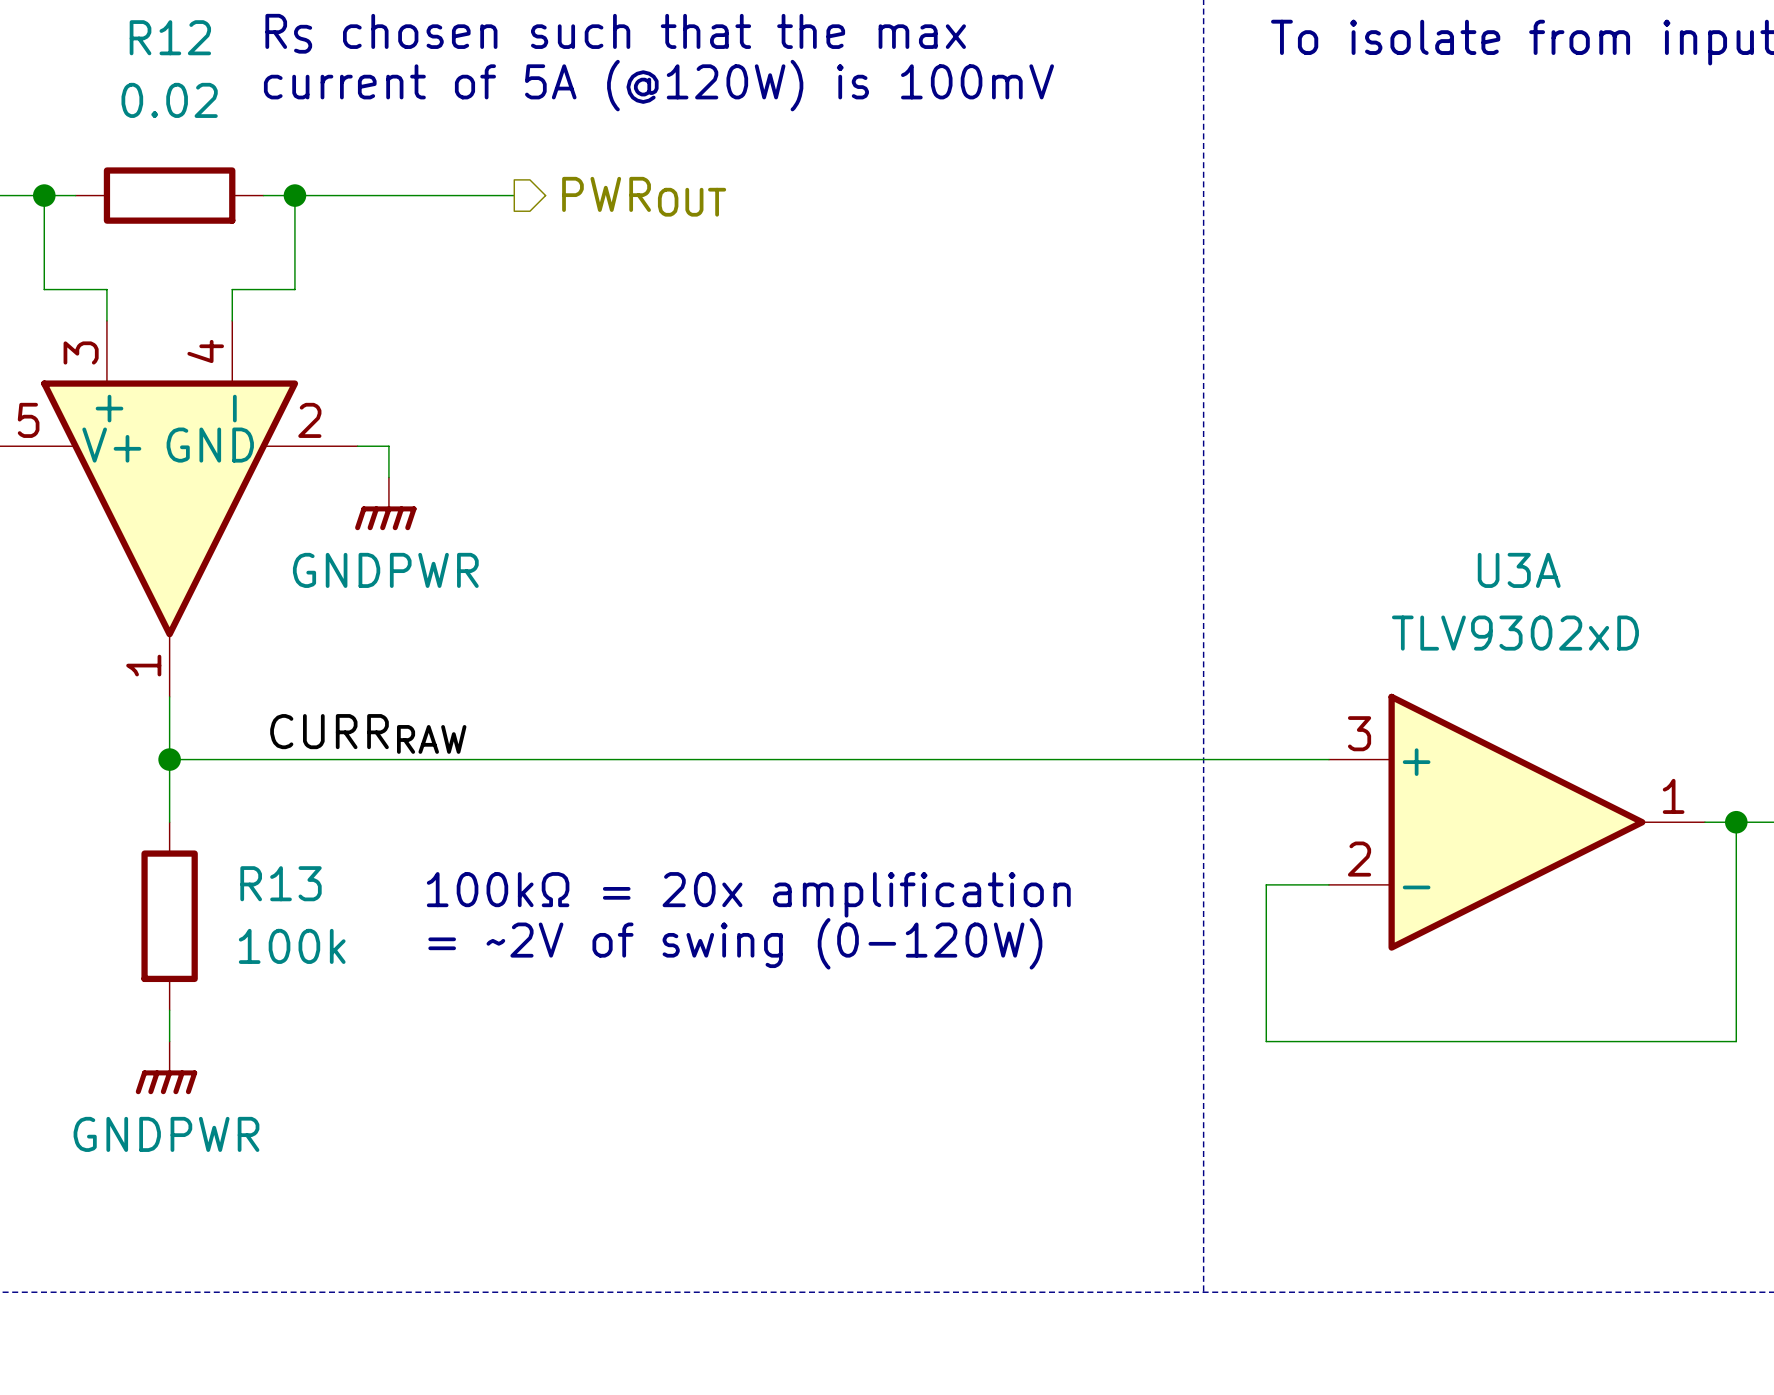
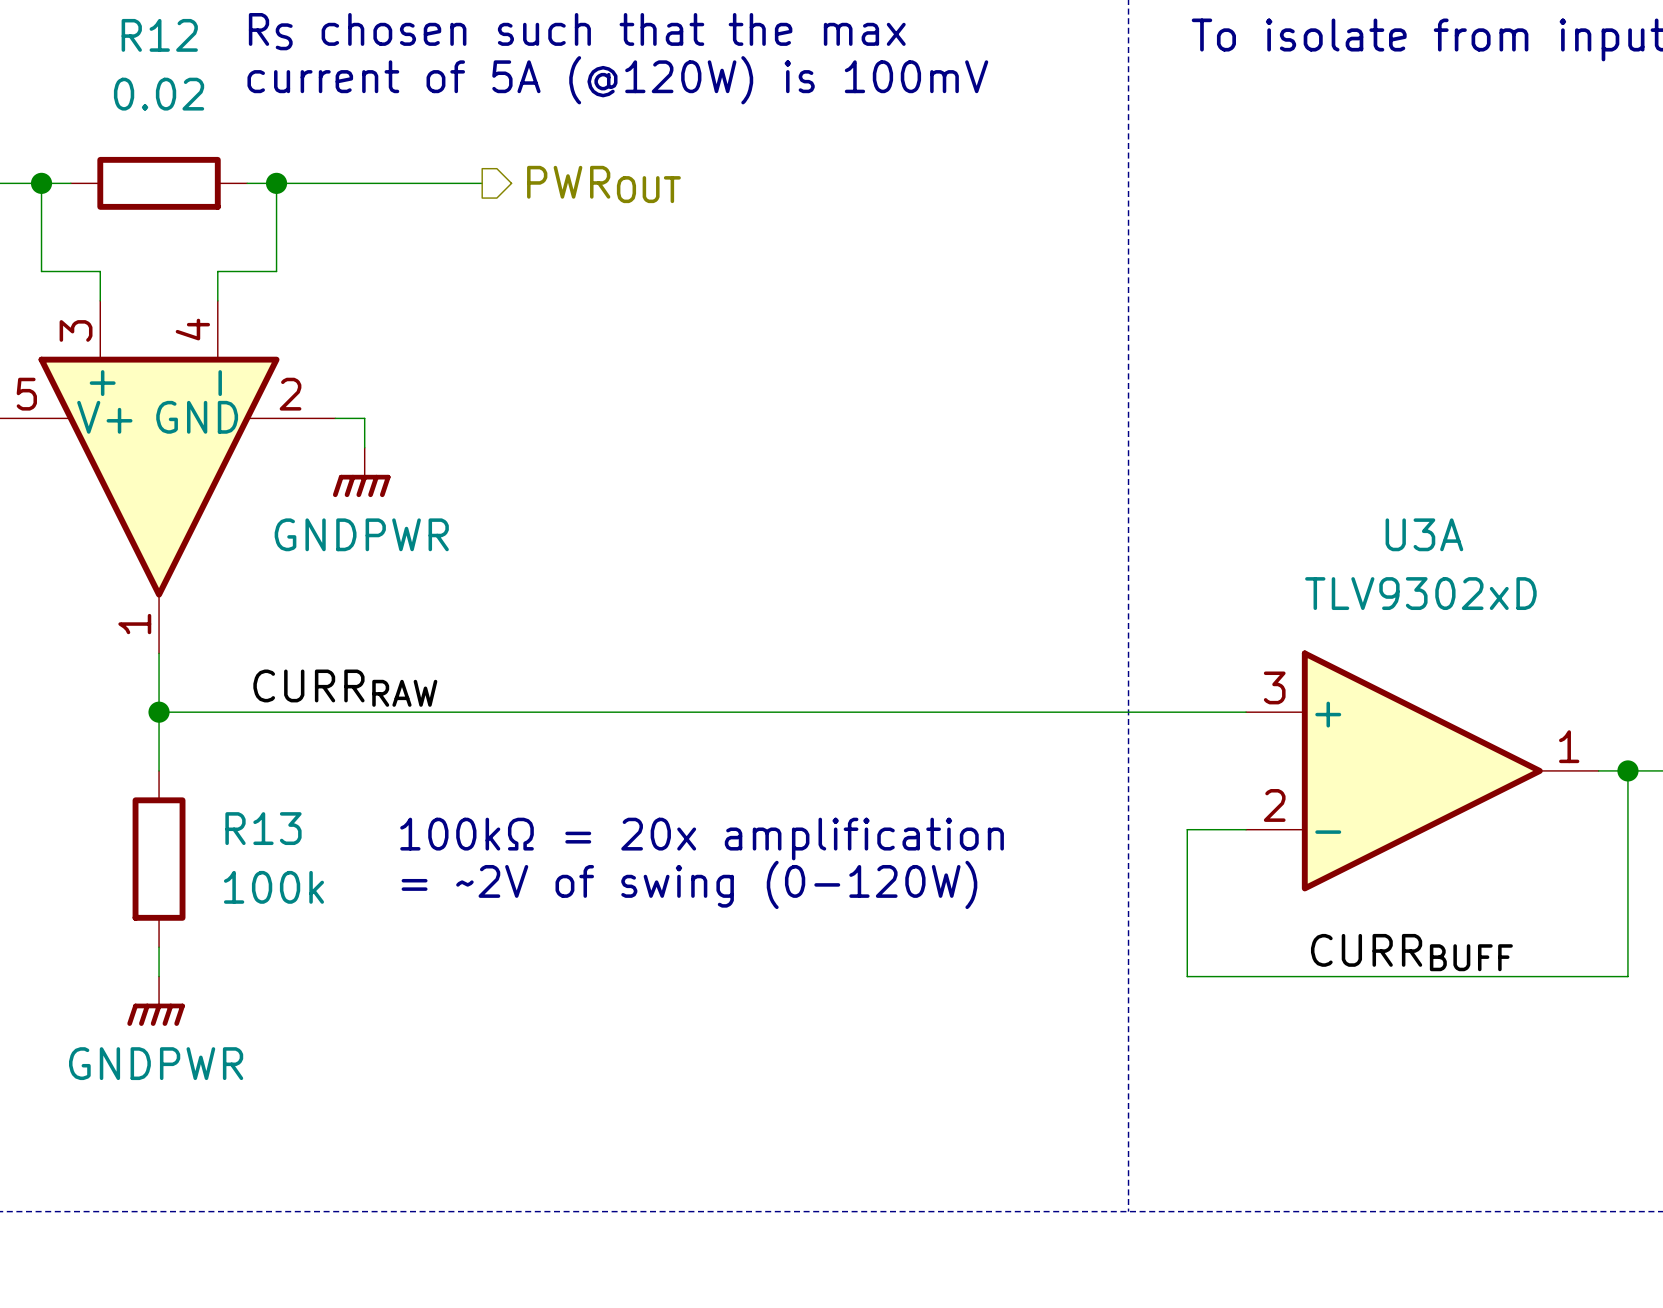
label: none -> CURRBUFF (1411, 952)

